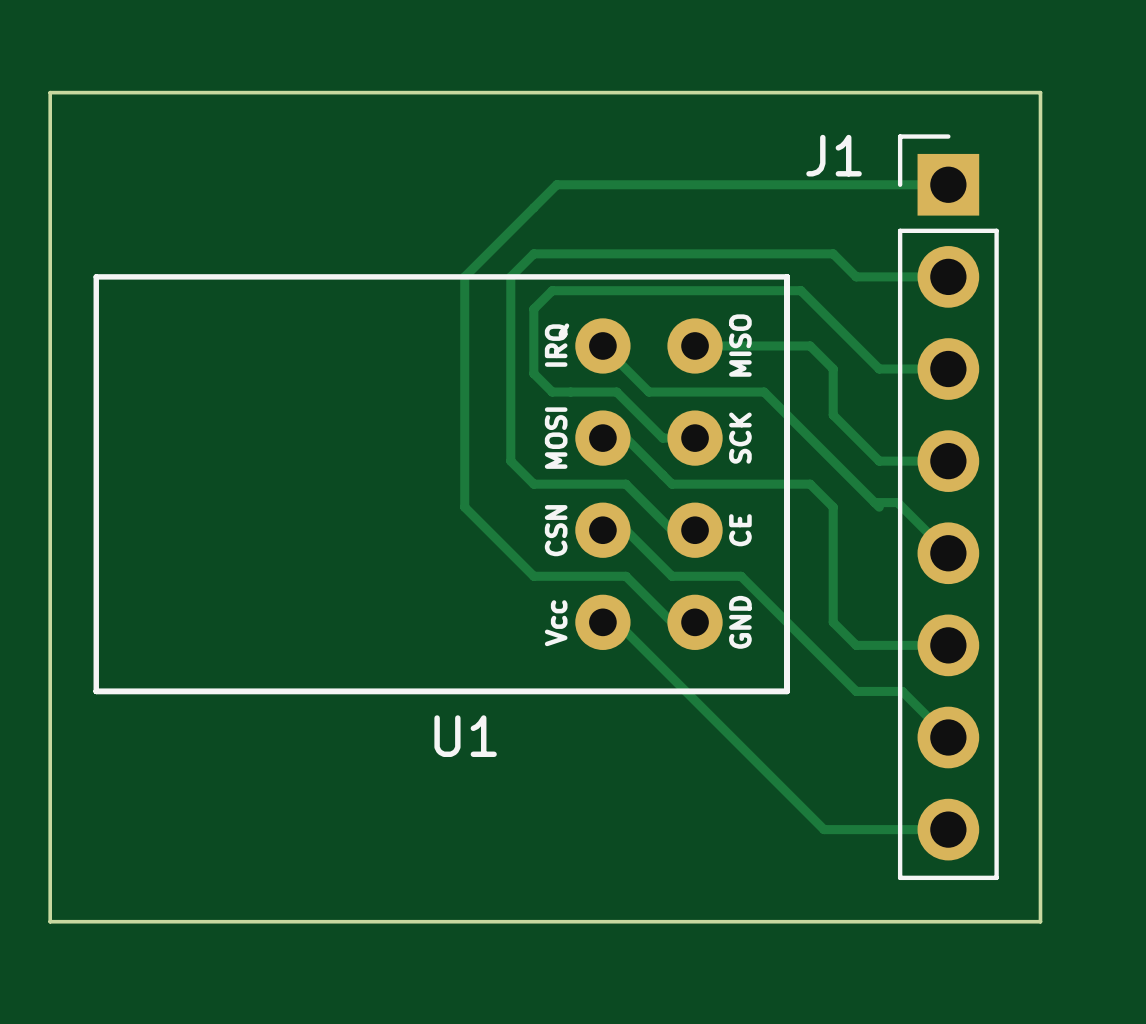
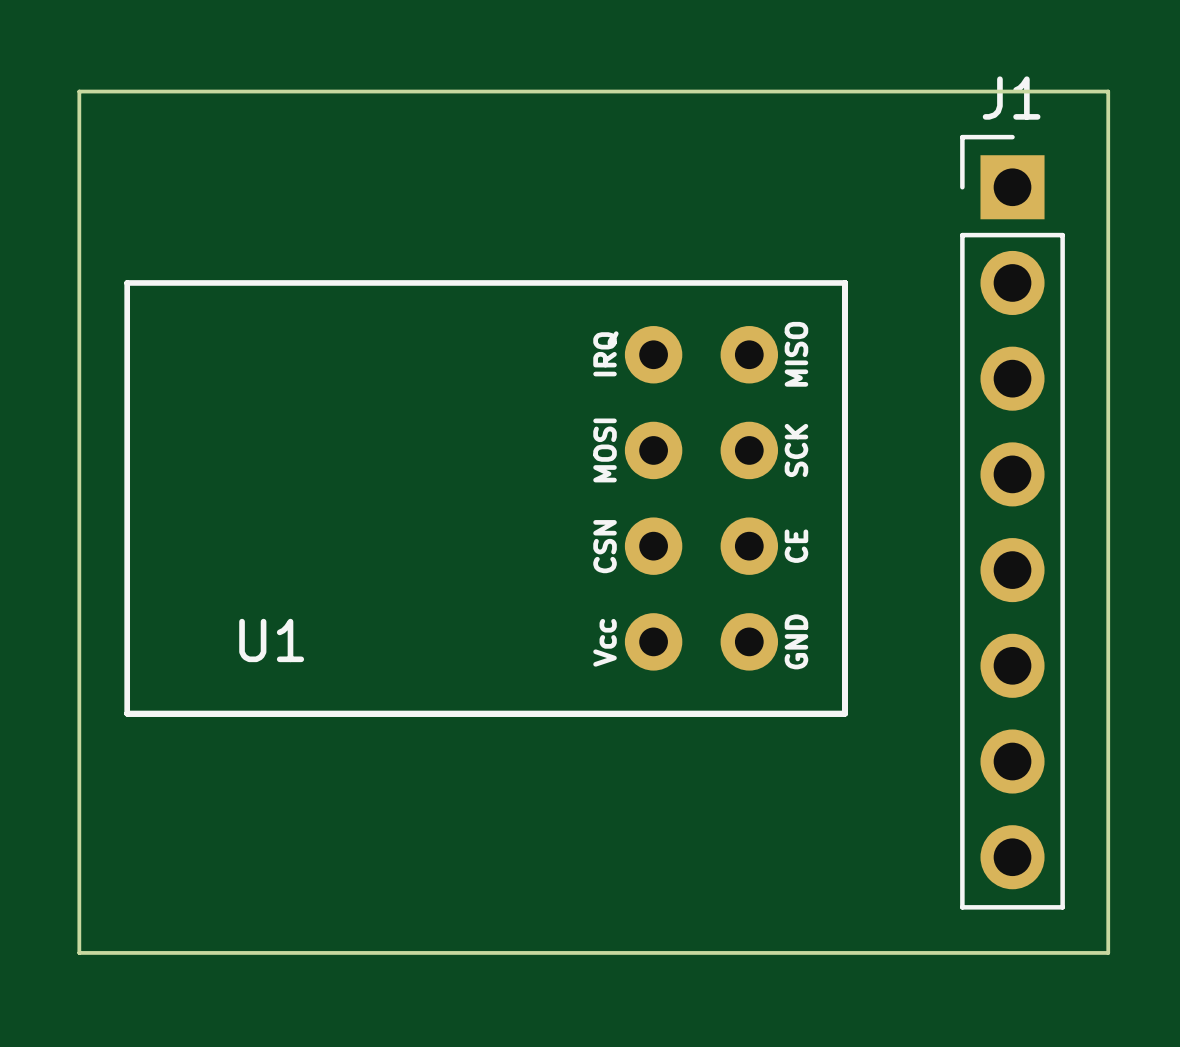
J1 name position: J1 (834, 155) -> J1 (1011, 98)
track: (948, 184) (556, 184) (464, 276) (464, 507) (533, 576) (625, 576) (672, 622) (695, 622) -> none
track: (948, 276) (856, 276) (833, 253) (533, 253) (510, 276) (510, 461) (533, 484) (625, 484) (672, 530) (695, 530) -> none
track: (602, 345) (648, 392) (764, 392) (879, 507) -> none
track: (695, 345) (810, 345) (833, 369) (833, 415) (879, 461) (948, 461) -> none
track: (948, 369) (879, 369) (800, 290) (552, 290) (533, 309) (533, 373) (552, 392) (616, 392) (662, 438) (695, 438) -> none
track: (602, 438) (625, 438) (672, 484) (810, 484) (833, 507) (833, 622) (856, 645) (948, 645) -> none
track: (874, 502) (897, 502) (948, 553) -> none
track: (602, 530) (625, 530) (672, 576) (741, 576) (856, 691) (902, 691) (948, 737) -> none
track: (602, 622) (616, 622) (824, 829) (948, 829) -> none
U1 name position: U1 (465, 736) -> U1 (271, 640)

